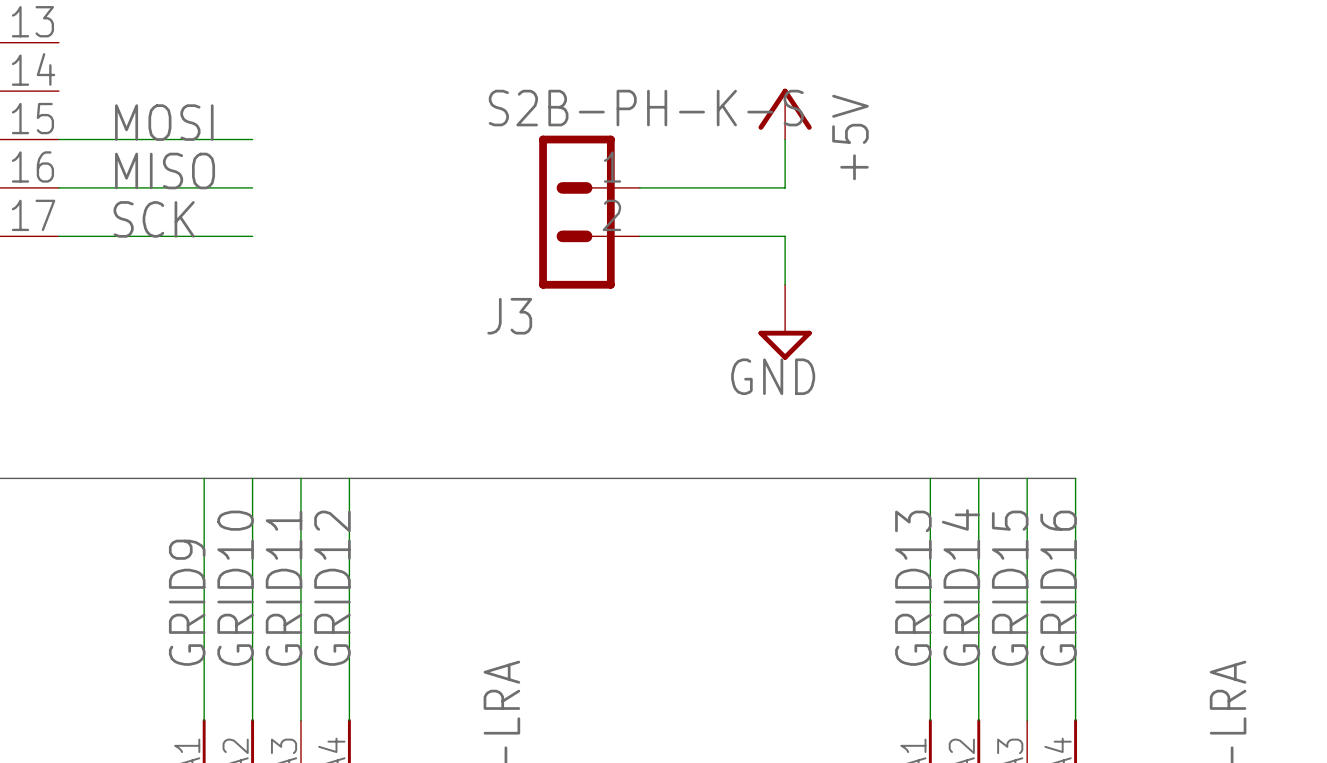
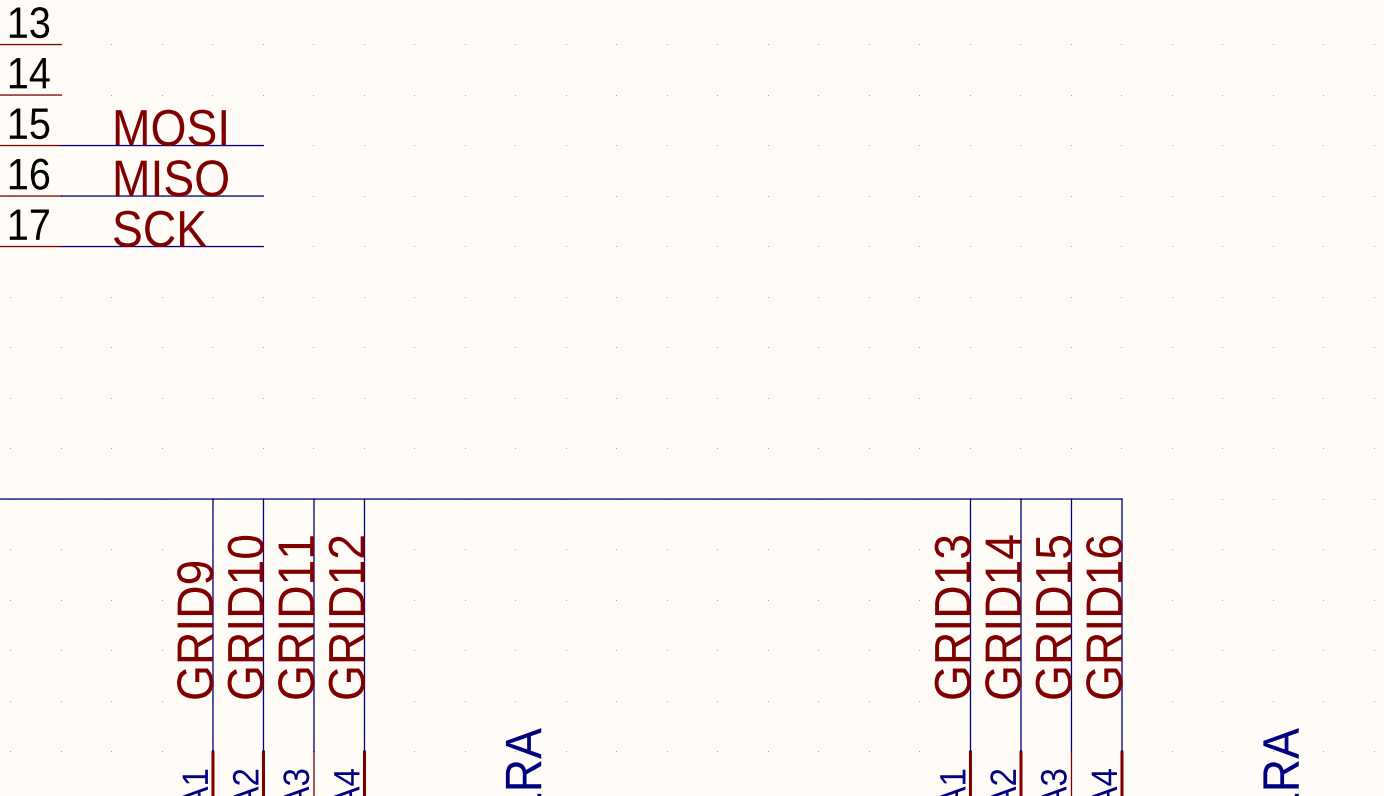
power symbol: +5V (785, 114) -> none
wire: (785, 139) (785, 187) (639, 187) -> none
J3: S2B-PH-K-S (589, 212) -> none
wire: (639, 236) (785, 236) (785, 284) -> none
power symbol: GND (785, 322) -> none

